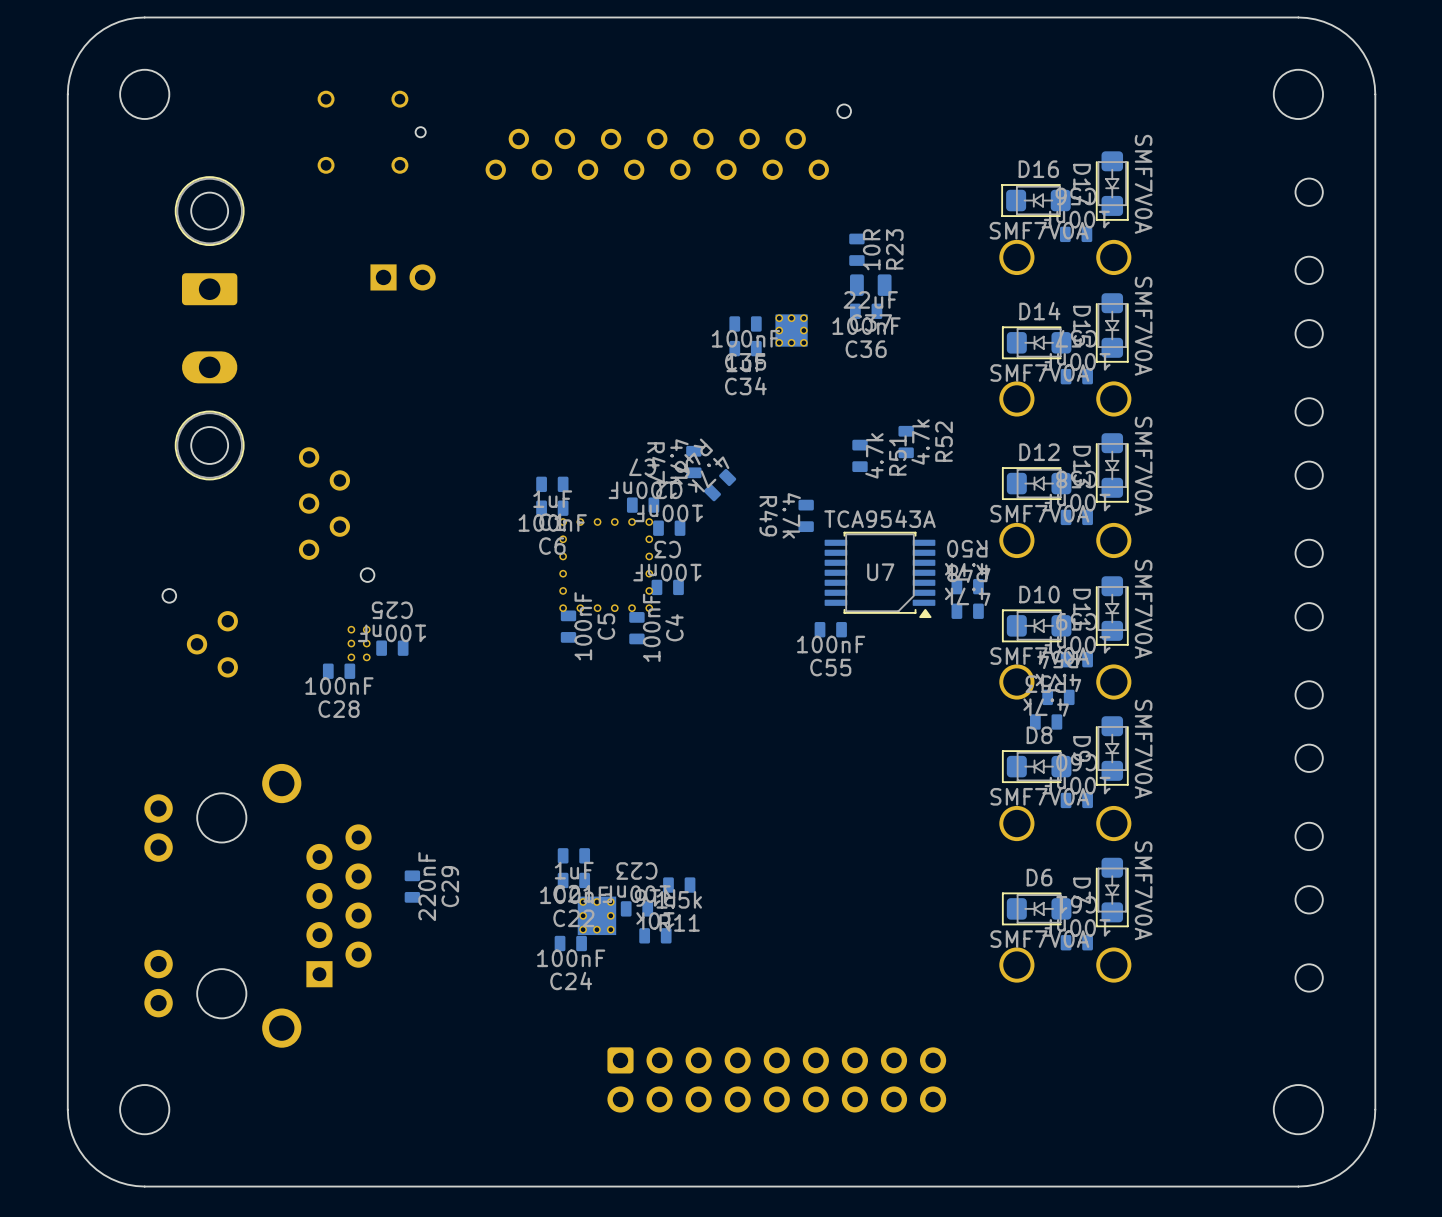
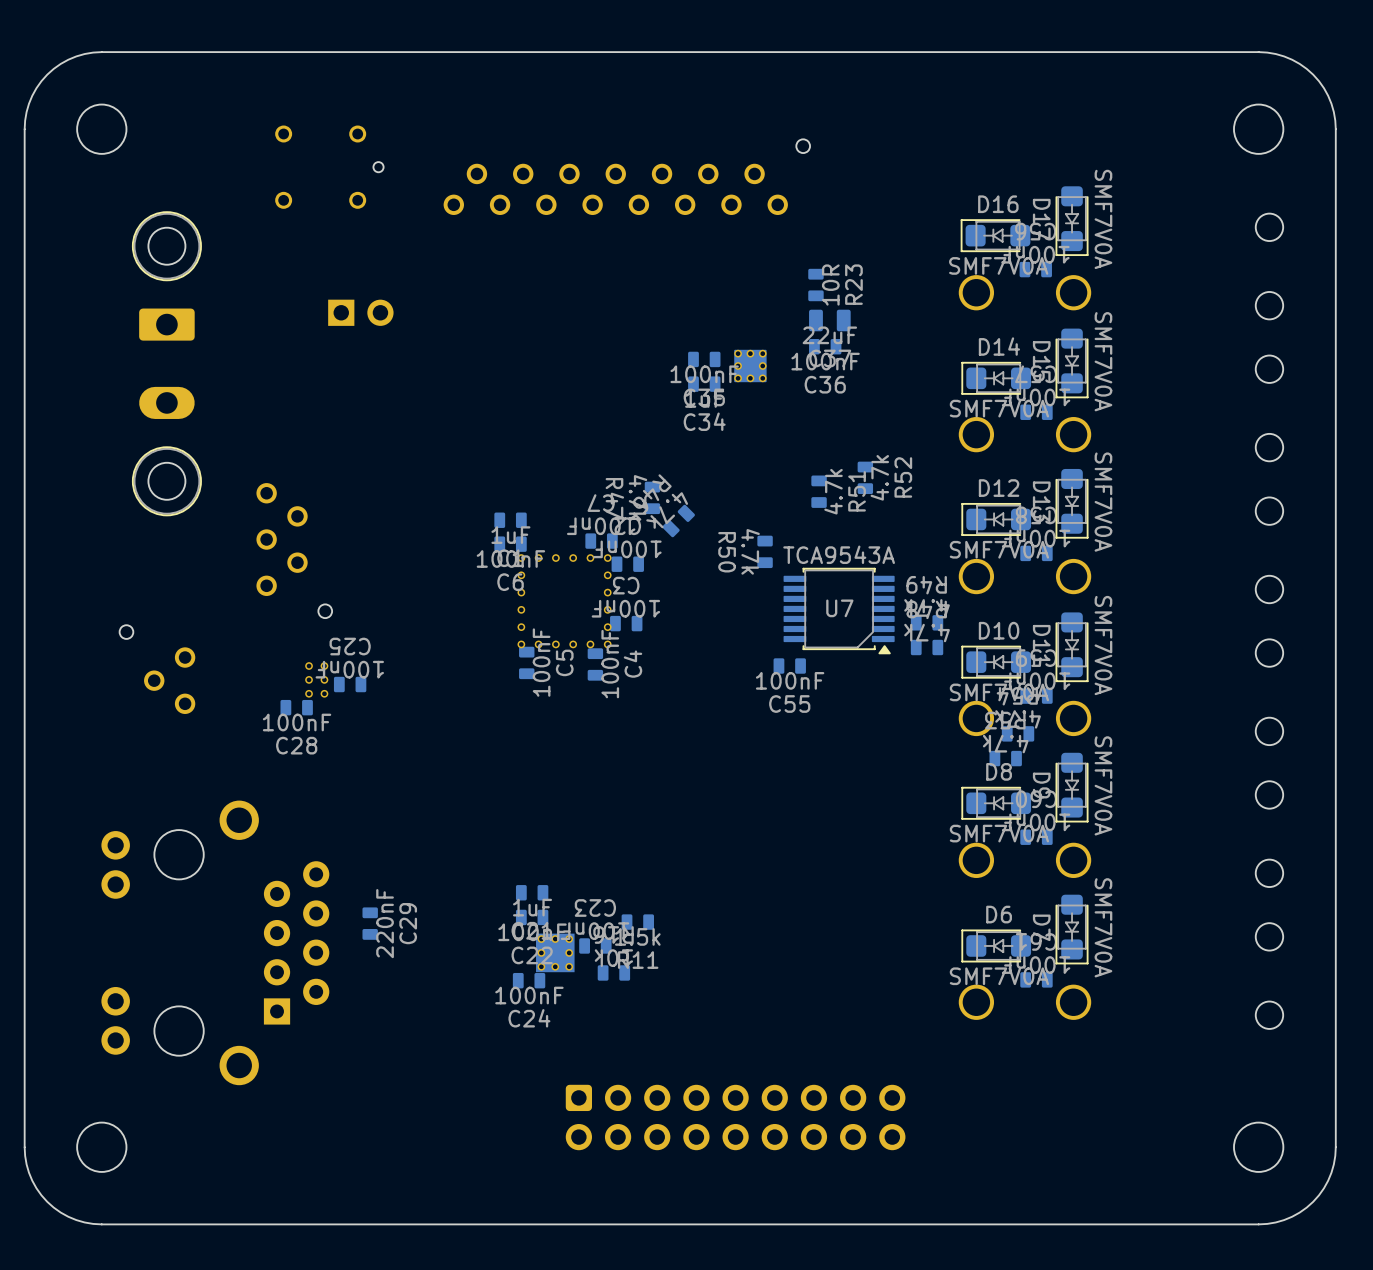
R49 name: R49 (768, 516) -> R50 (727, 552)
R50 name: R50 (967, 548) -> R49 (926, 585)

